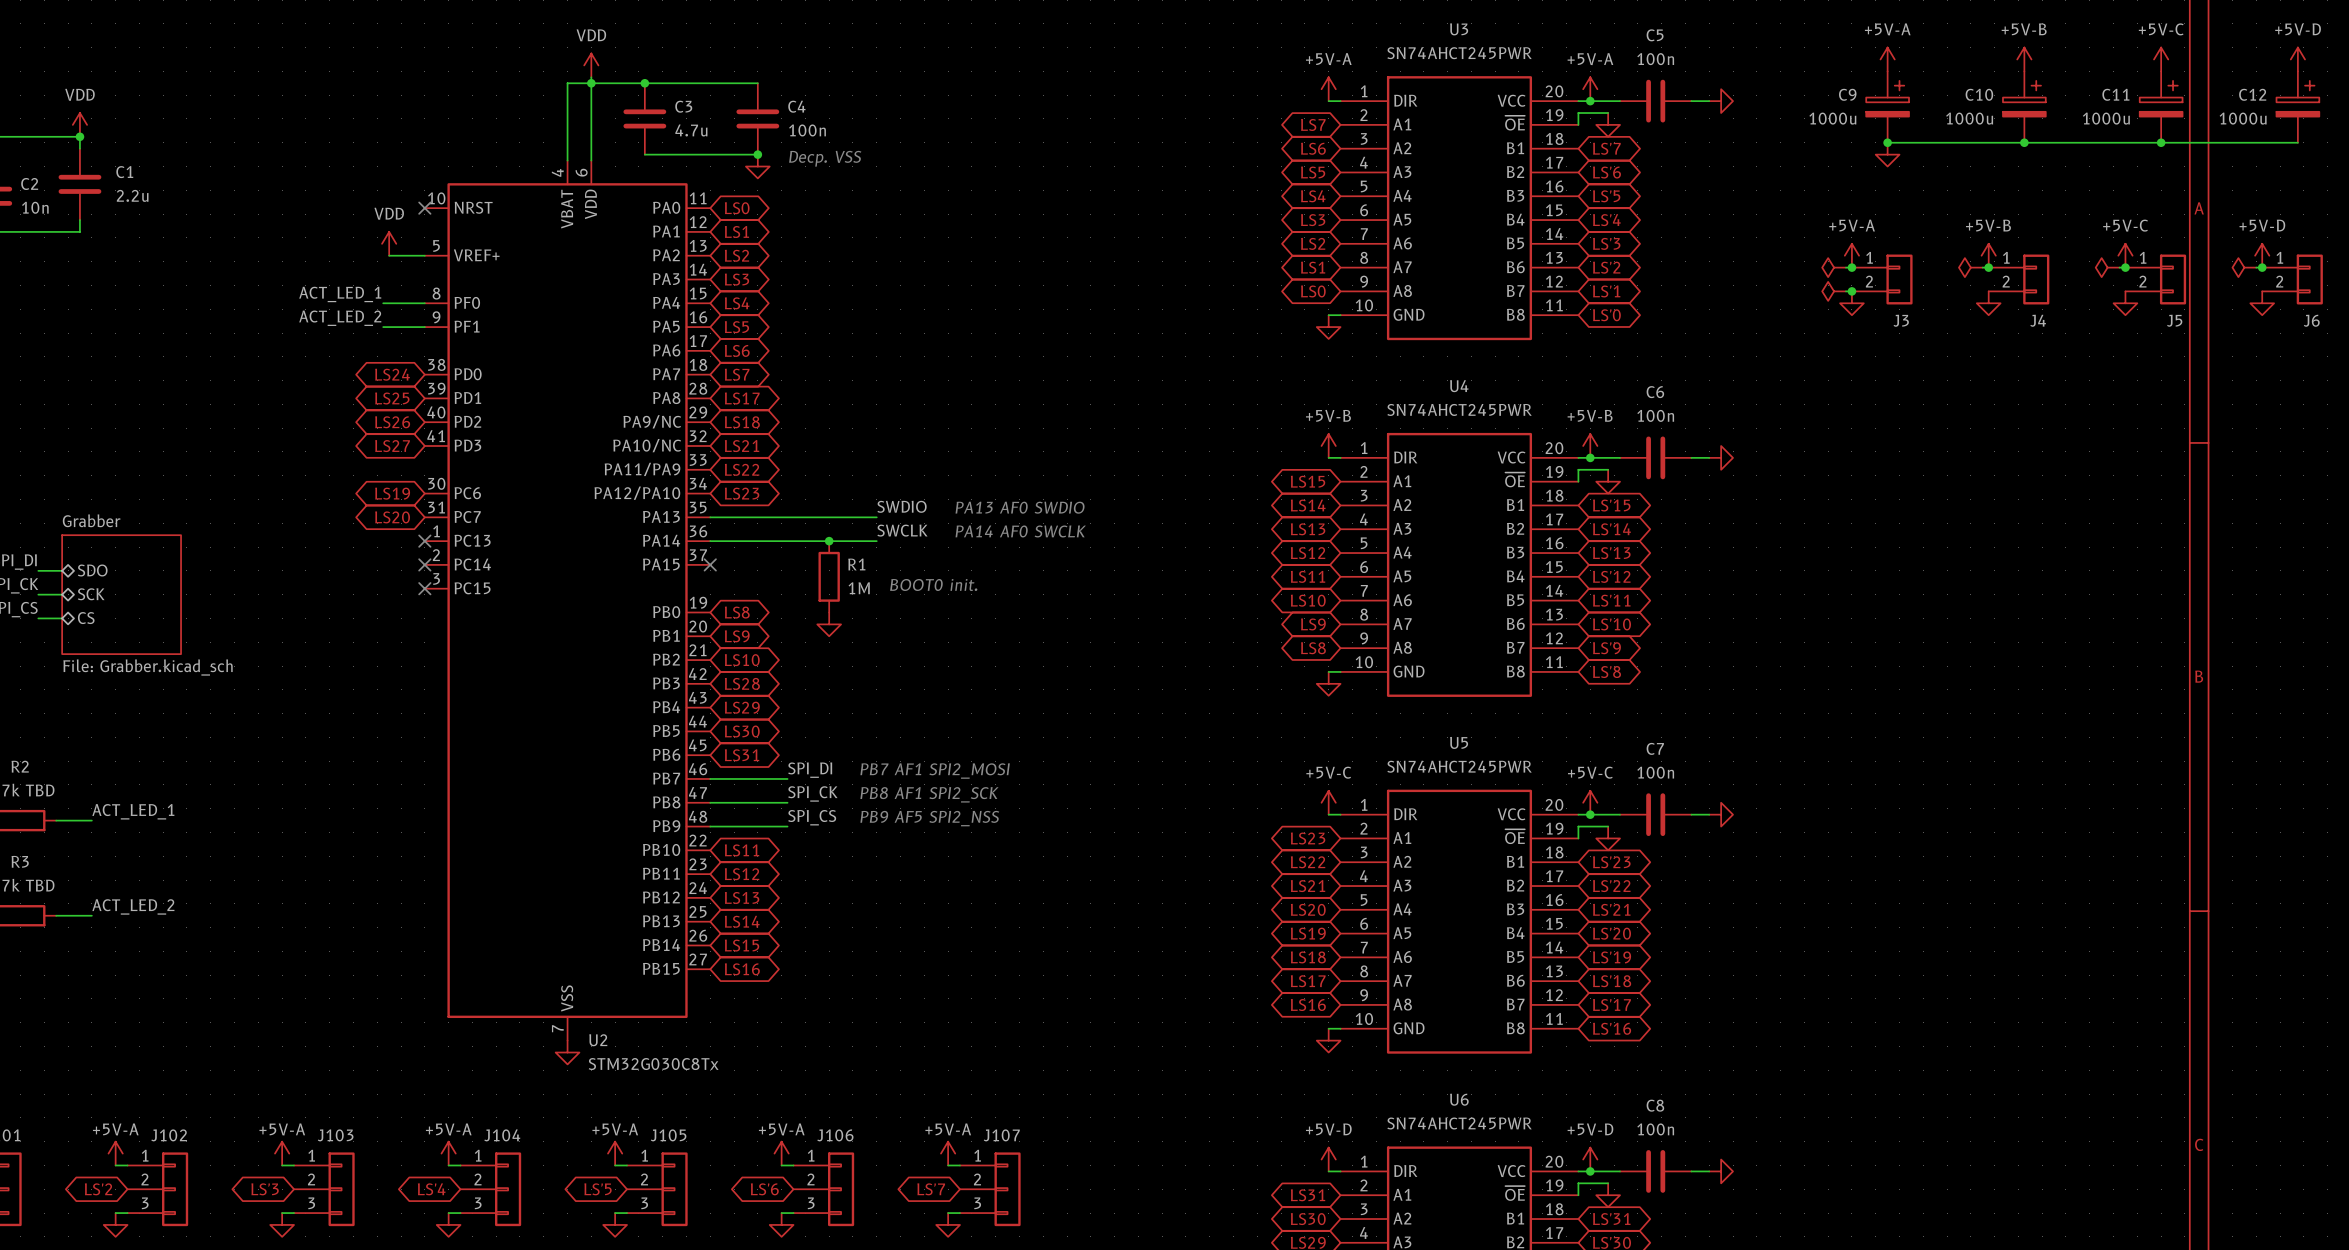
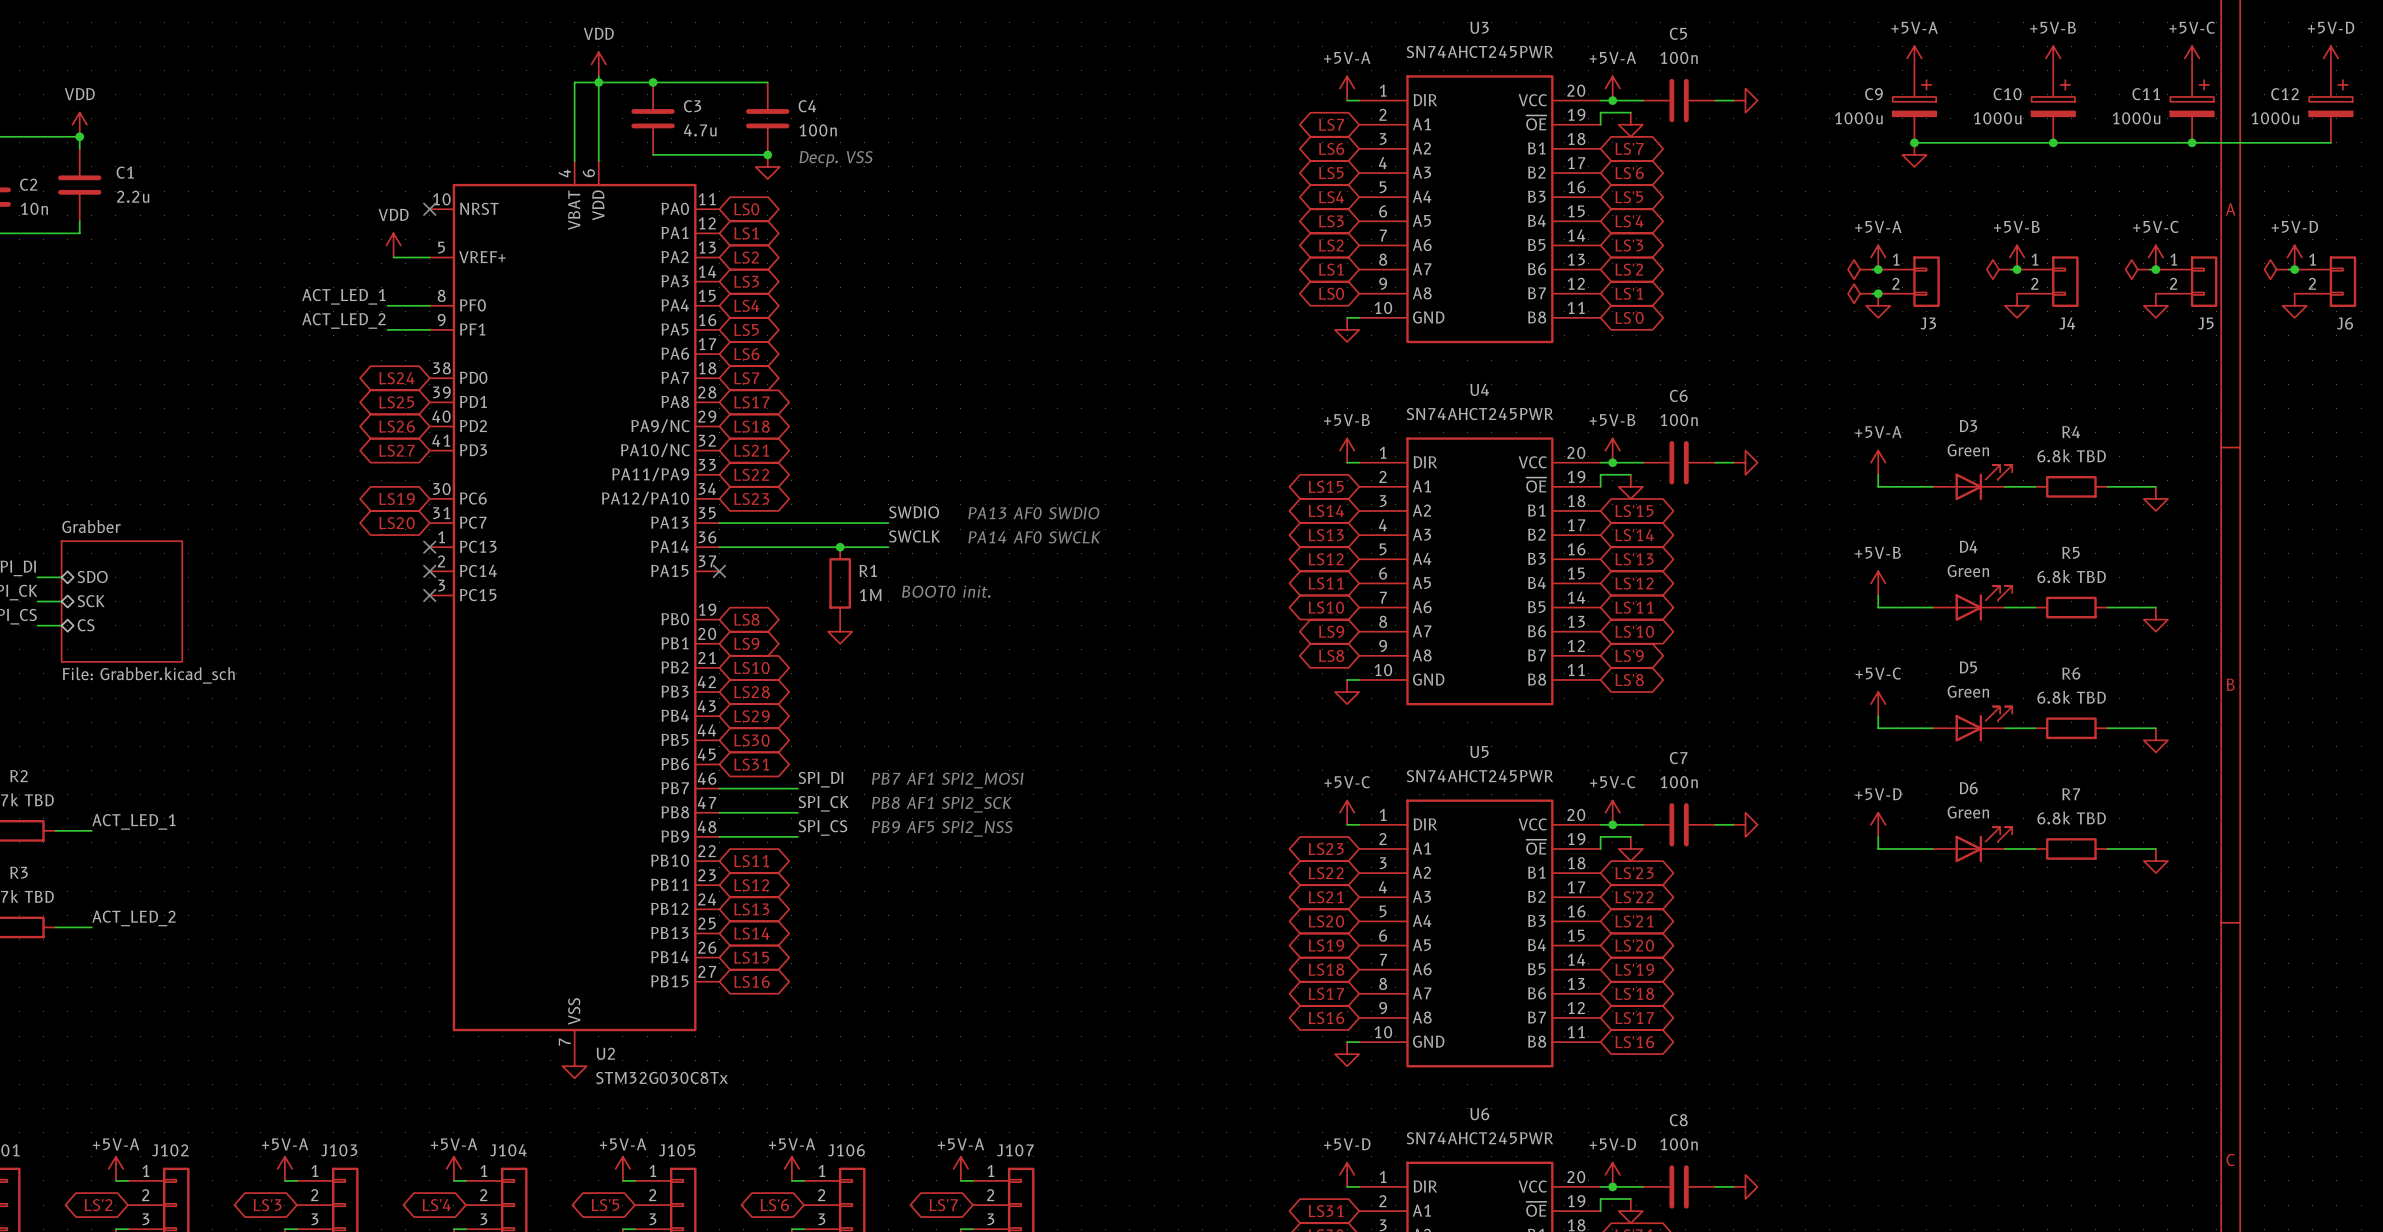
power symbol: none -> +5V-A (1878, 462)
wire: none -> (1878, 474) (1878, 486) (1932, 486)
D3: none -> Green (1972, 482)
wire: none -> (2004, 486) (2035, 486)
R4: none -> 6.8k TBD (2071, 486)
wire: none -> (2107, 486) (2155, 486)
power symbol: none -> (2155, 498)
power symbol: none -> +5V-B (1878, 583)
wire: none -> (1878, 595) (1878, 607) (1932, 607)
D4: none -> Green (1972, 603)
wire: none -> (2004, 607) (2035, 607)
R5: none -> 6.8k TBD (2071, 607)
wire: none -> (2107, 607) (2155, 607)
power symbol: none -> (2155, 619)
power symbol: none -> +5V-C (1878, 704)
wire: none -> (1878, 716) (1878, 728) (1932, 728)
D5: none -> Green (1972, 724)
wire: none -> (2004, 728) (2035, 728)
R6: none -> 6.8k TBD (2071, 728)
wire: none -> (2107, 728) (2155, 728)
power symbol: none -> (2155, 740)
power symbol: none -> +5V-D (1878, 824)
wire: none -> (1878, 836) (1878, 848) (1932, 848)
D6: none -> Green (1972, 844)
wire: none -> (2004, 848) (2035, 848)
R7: none -> 6.8k TBD (2071, 848)
wire: none -> (2107, 848) (2155, 848)
power symbol: none -> (2155, 861)

